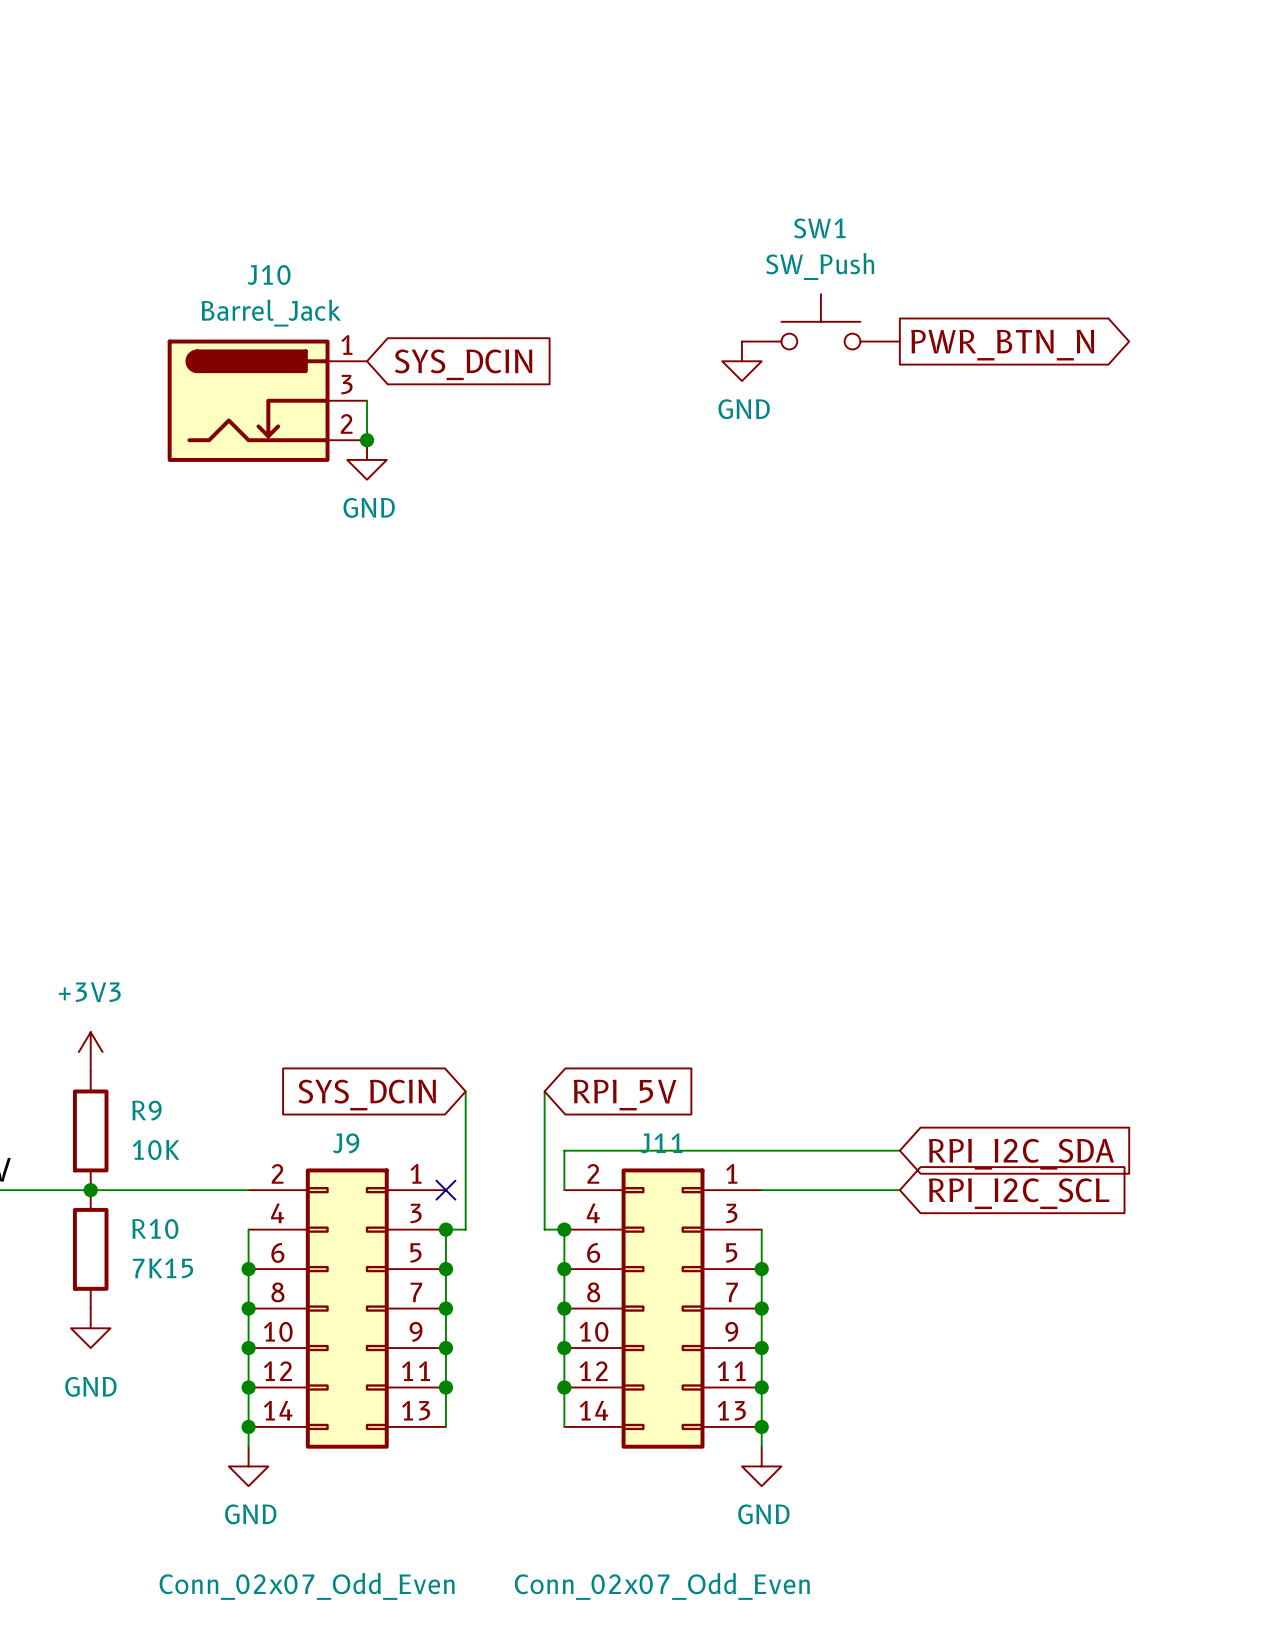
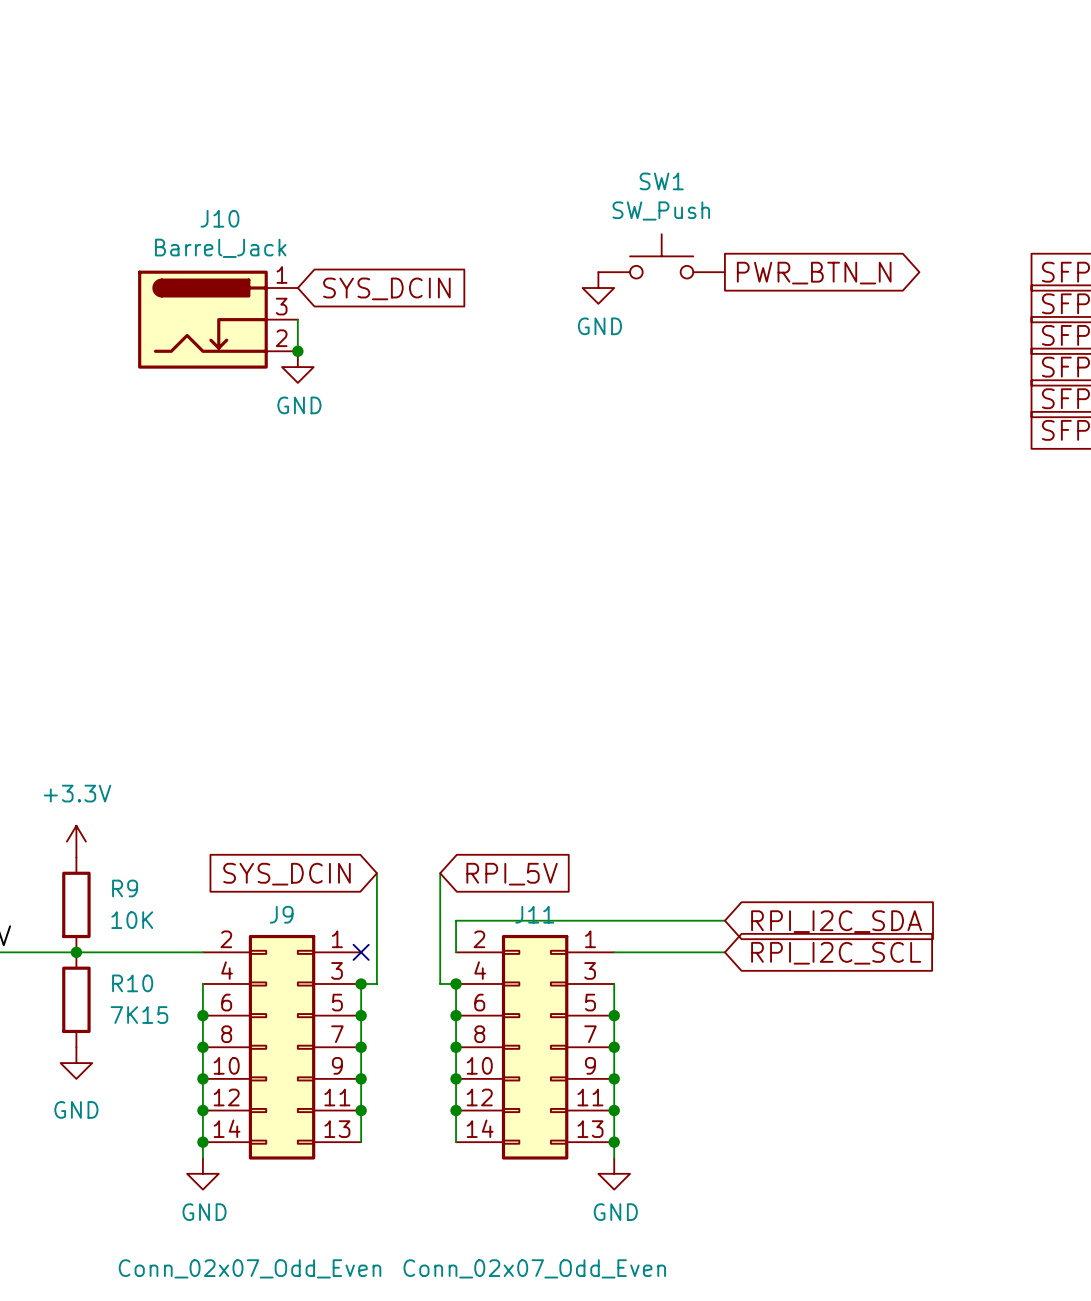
power symbol: +3V3 (90, 1052) -> +3.3V (76, 841)

